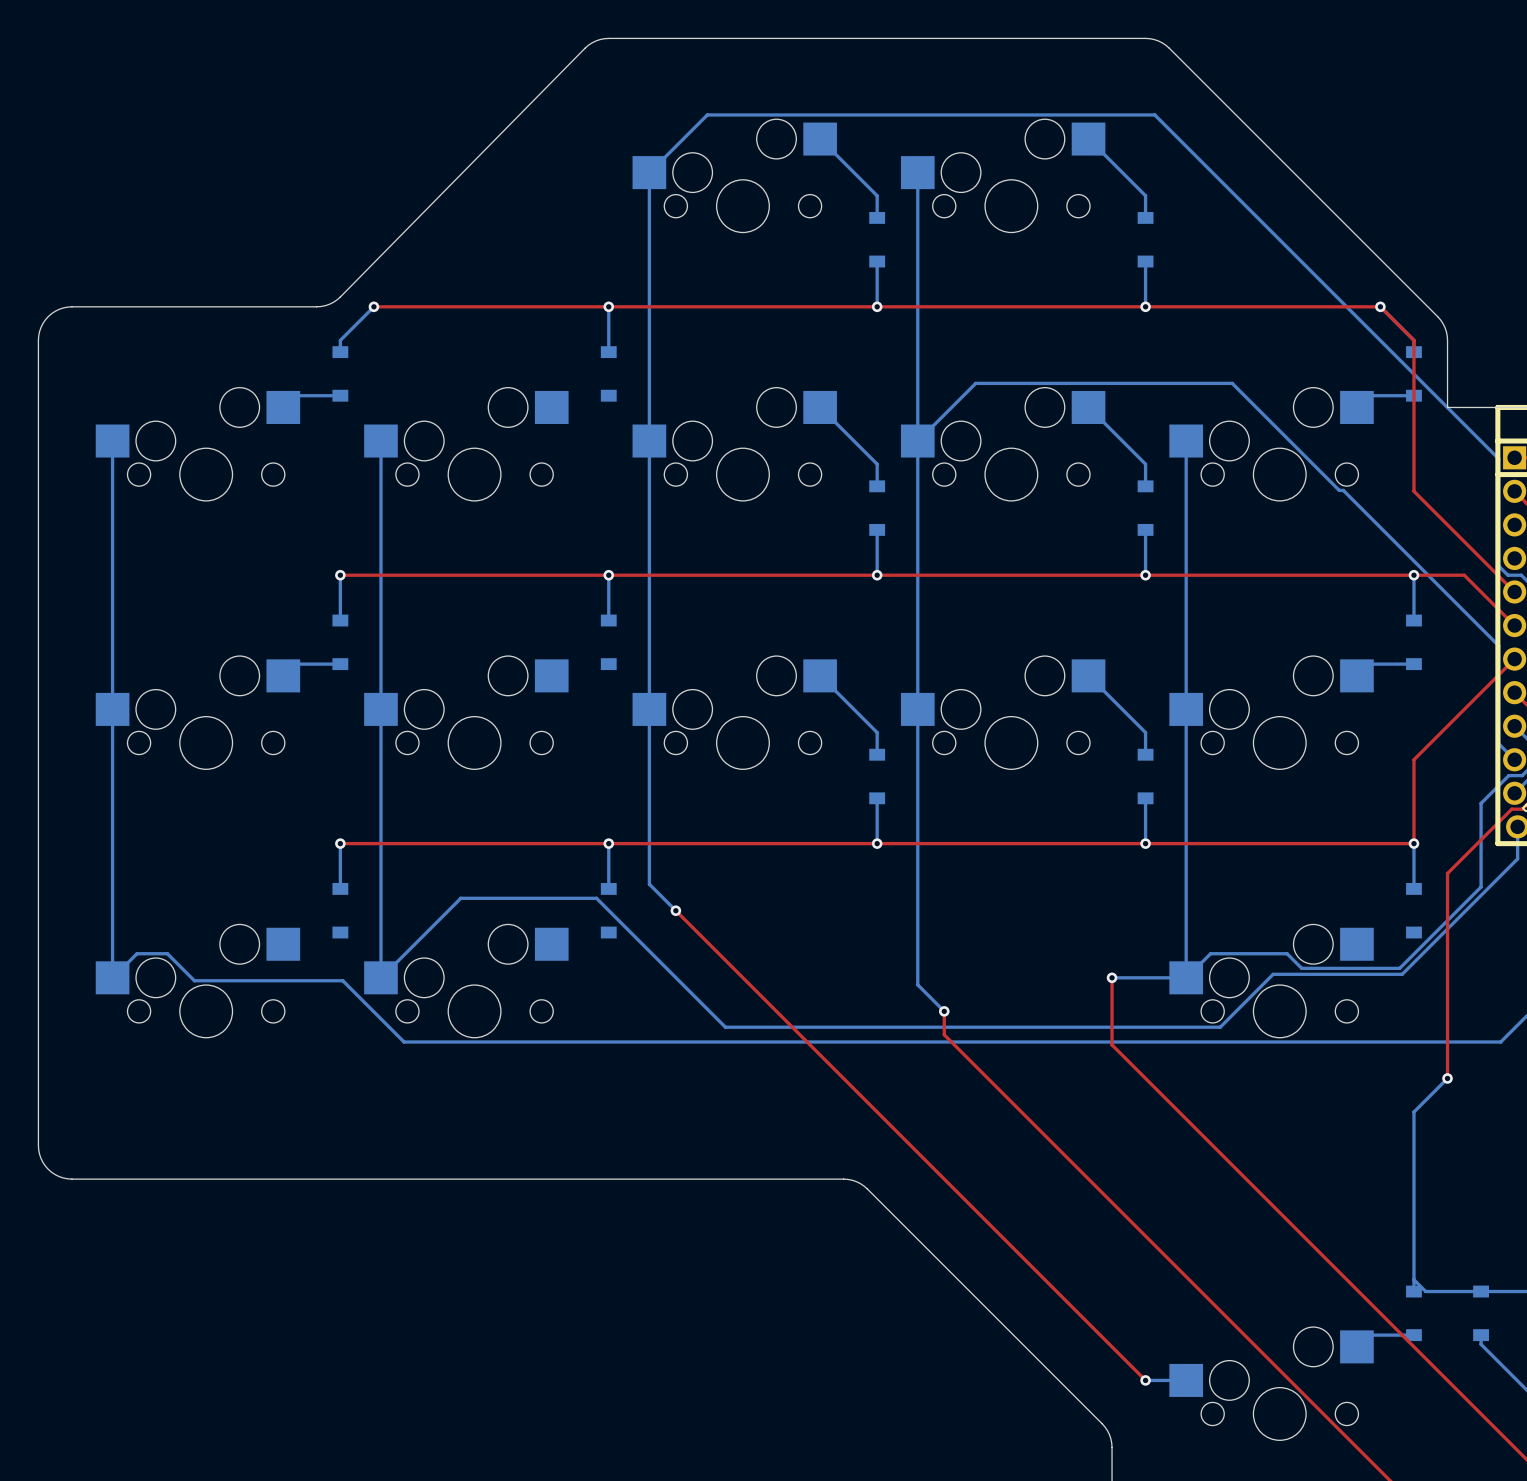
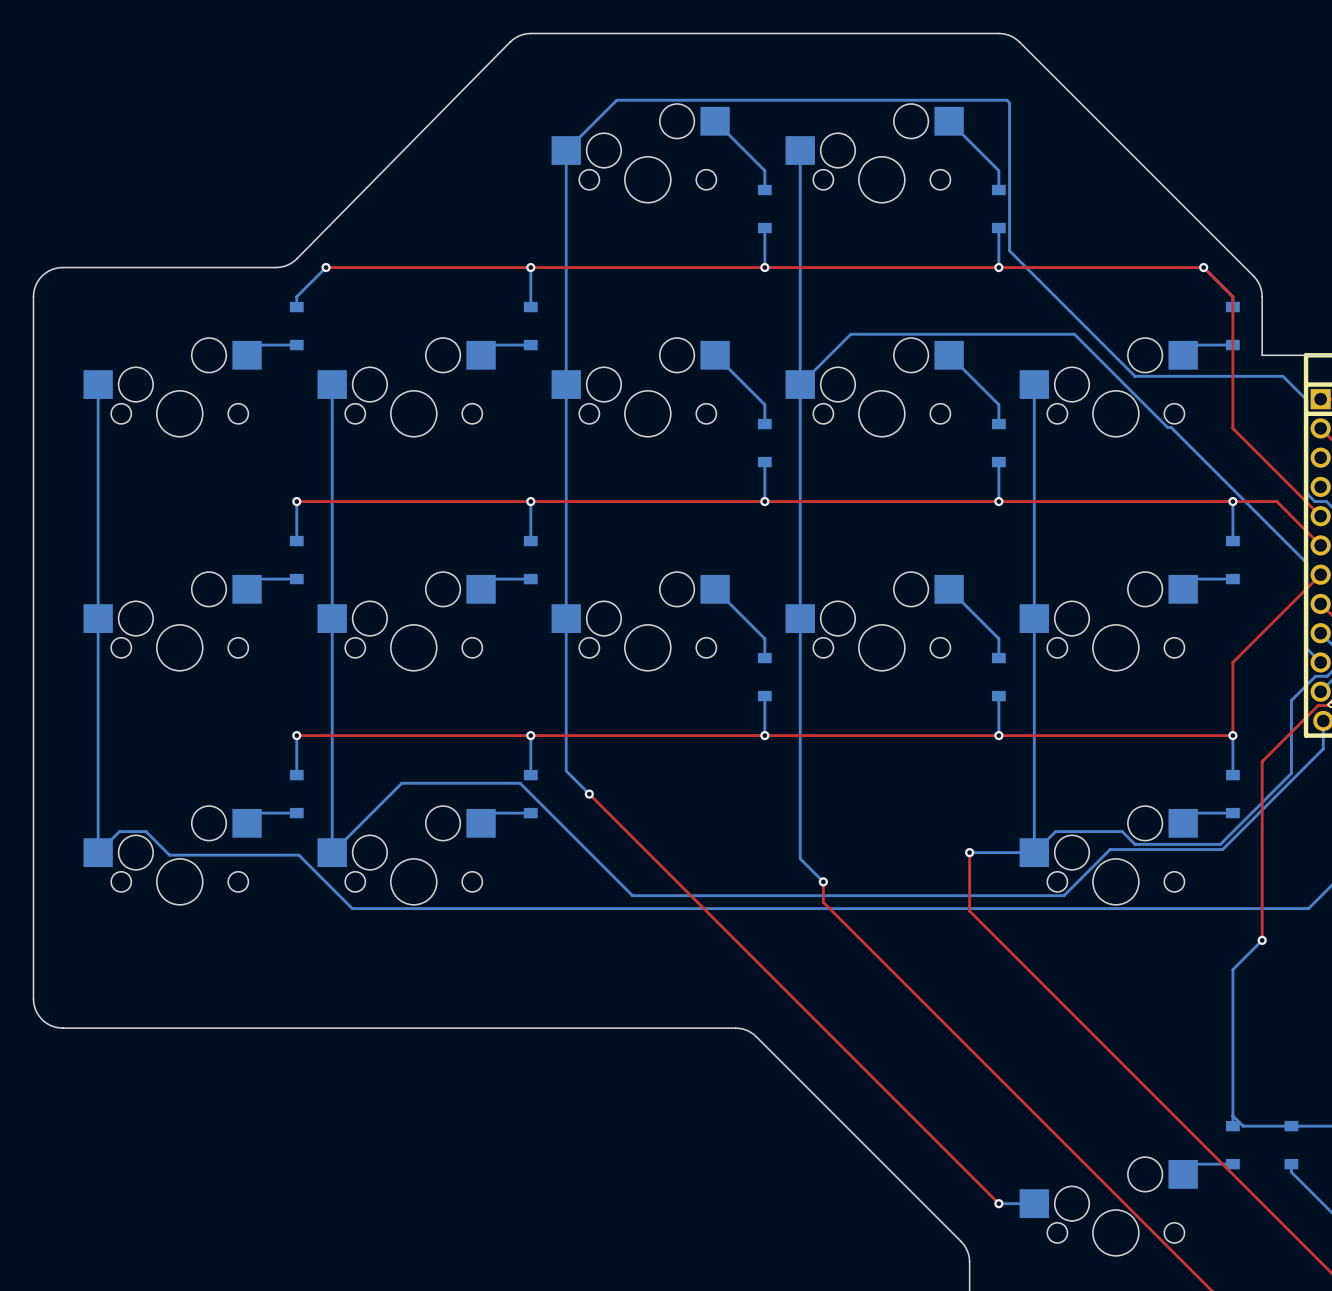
bottom track: (1157, 117) (1471, 431) -> (1009, 102) (1009, 250) (1135, 376) (1283, 376)
bottom track: none -> (530, 345) (491, 345) (481, 355)
bottom track: none -> (530, 579) (491, 579) (481, 589)
bottom track: none -> (296, 813) (257, 813) (247, 823)
bottom track: none -> (530, 813) (491, 813) (481, 823)
bottom track: none -> (1232, 813) (1193, 813) (1183, 823)

